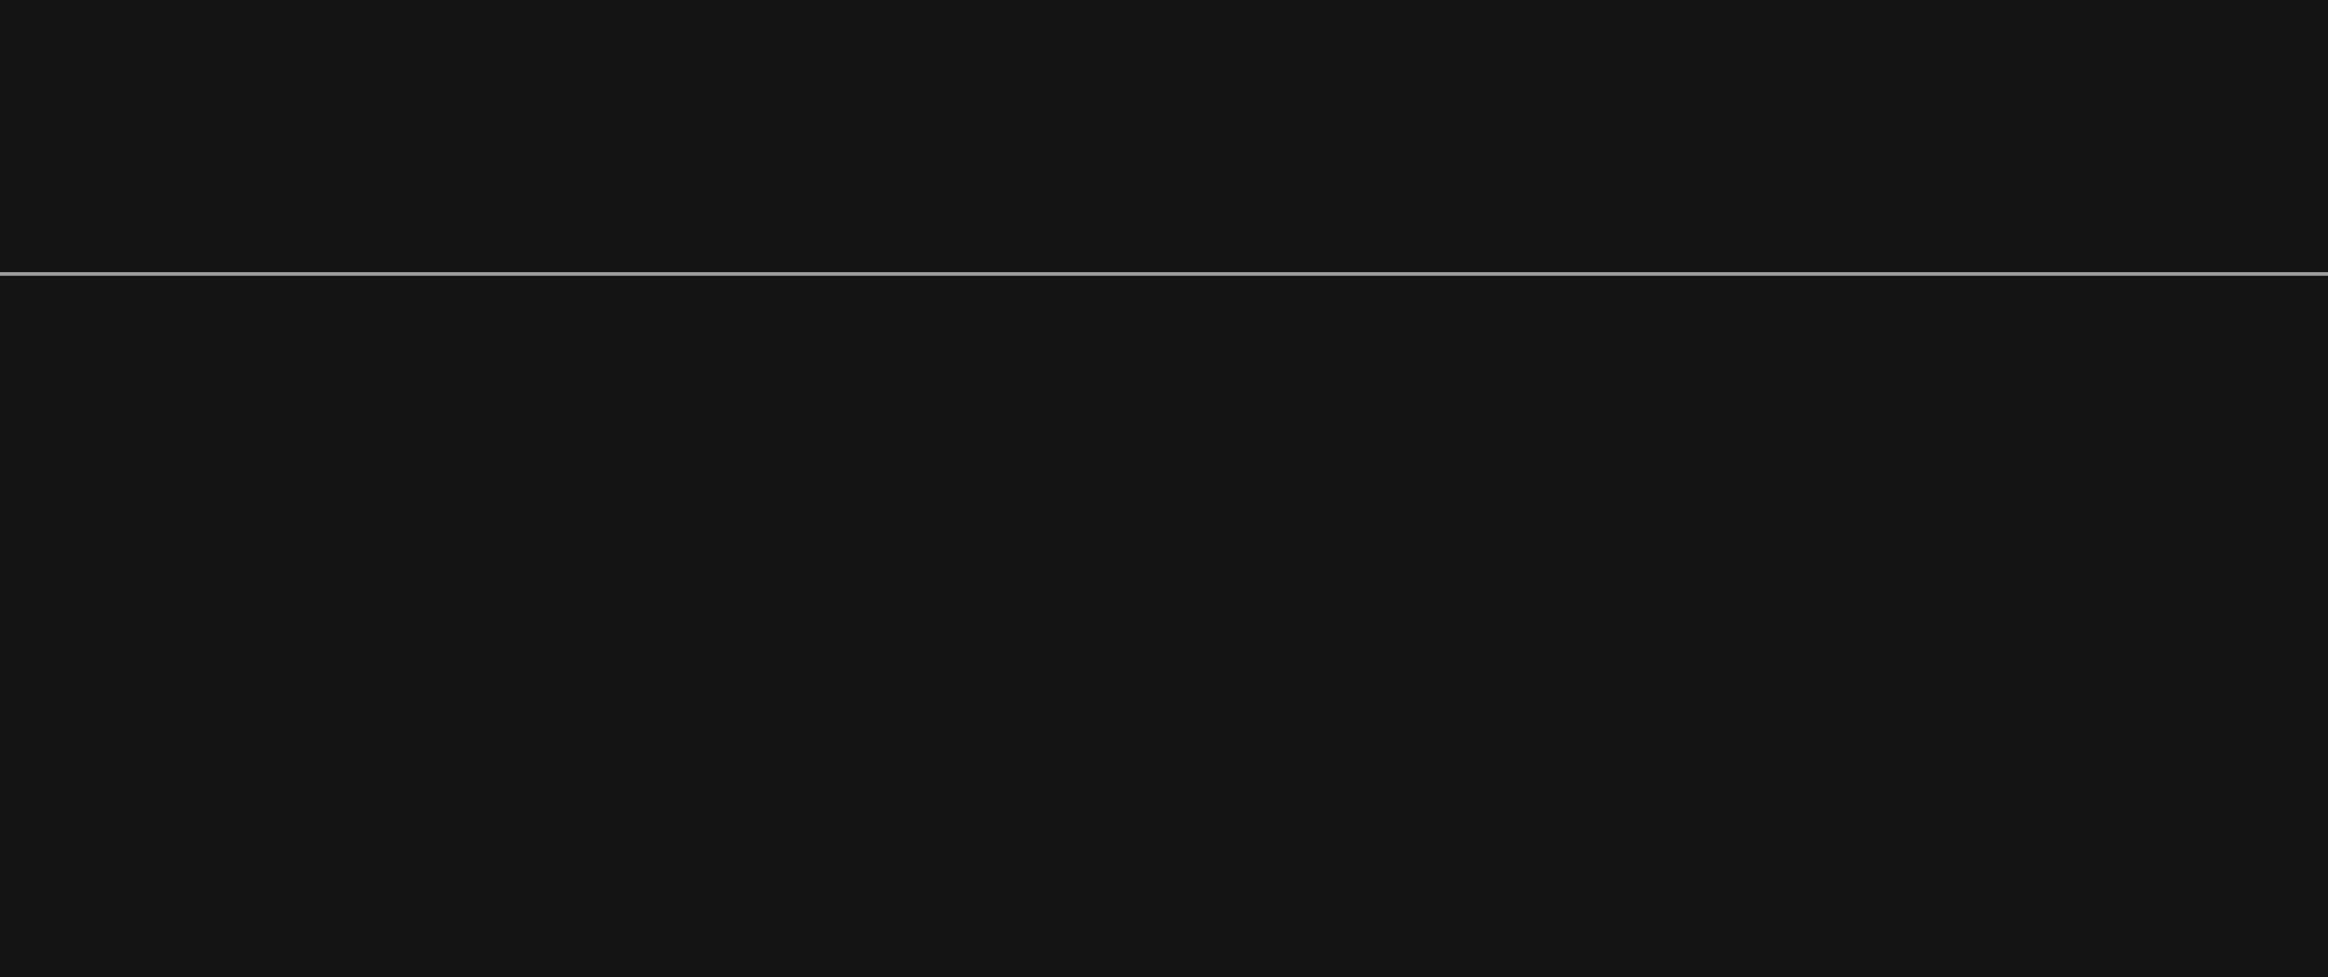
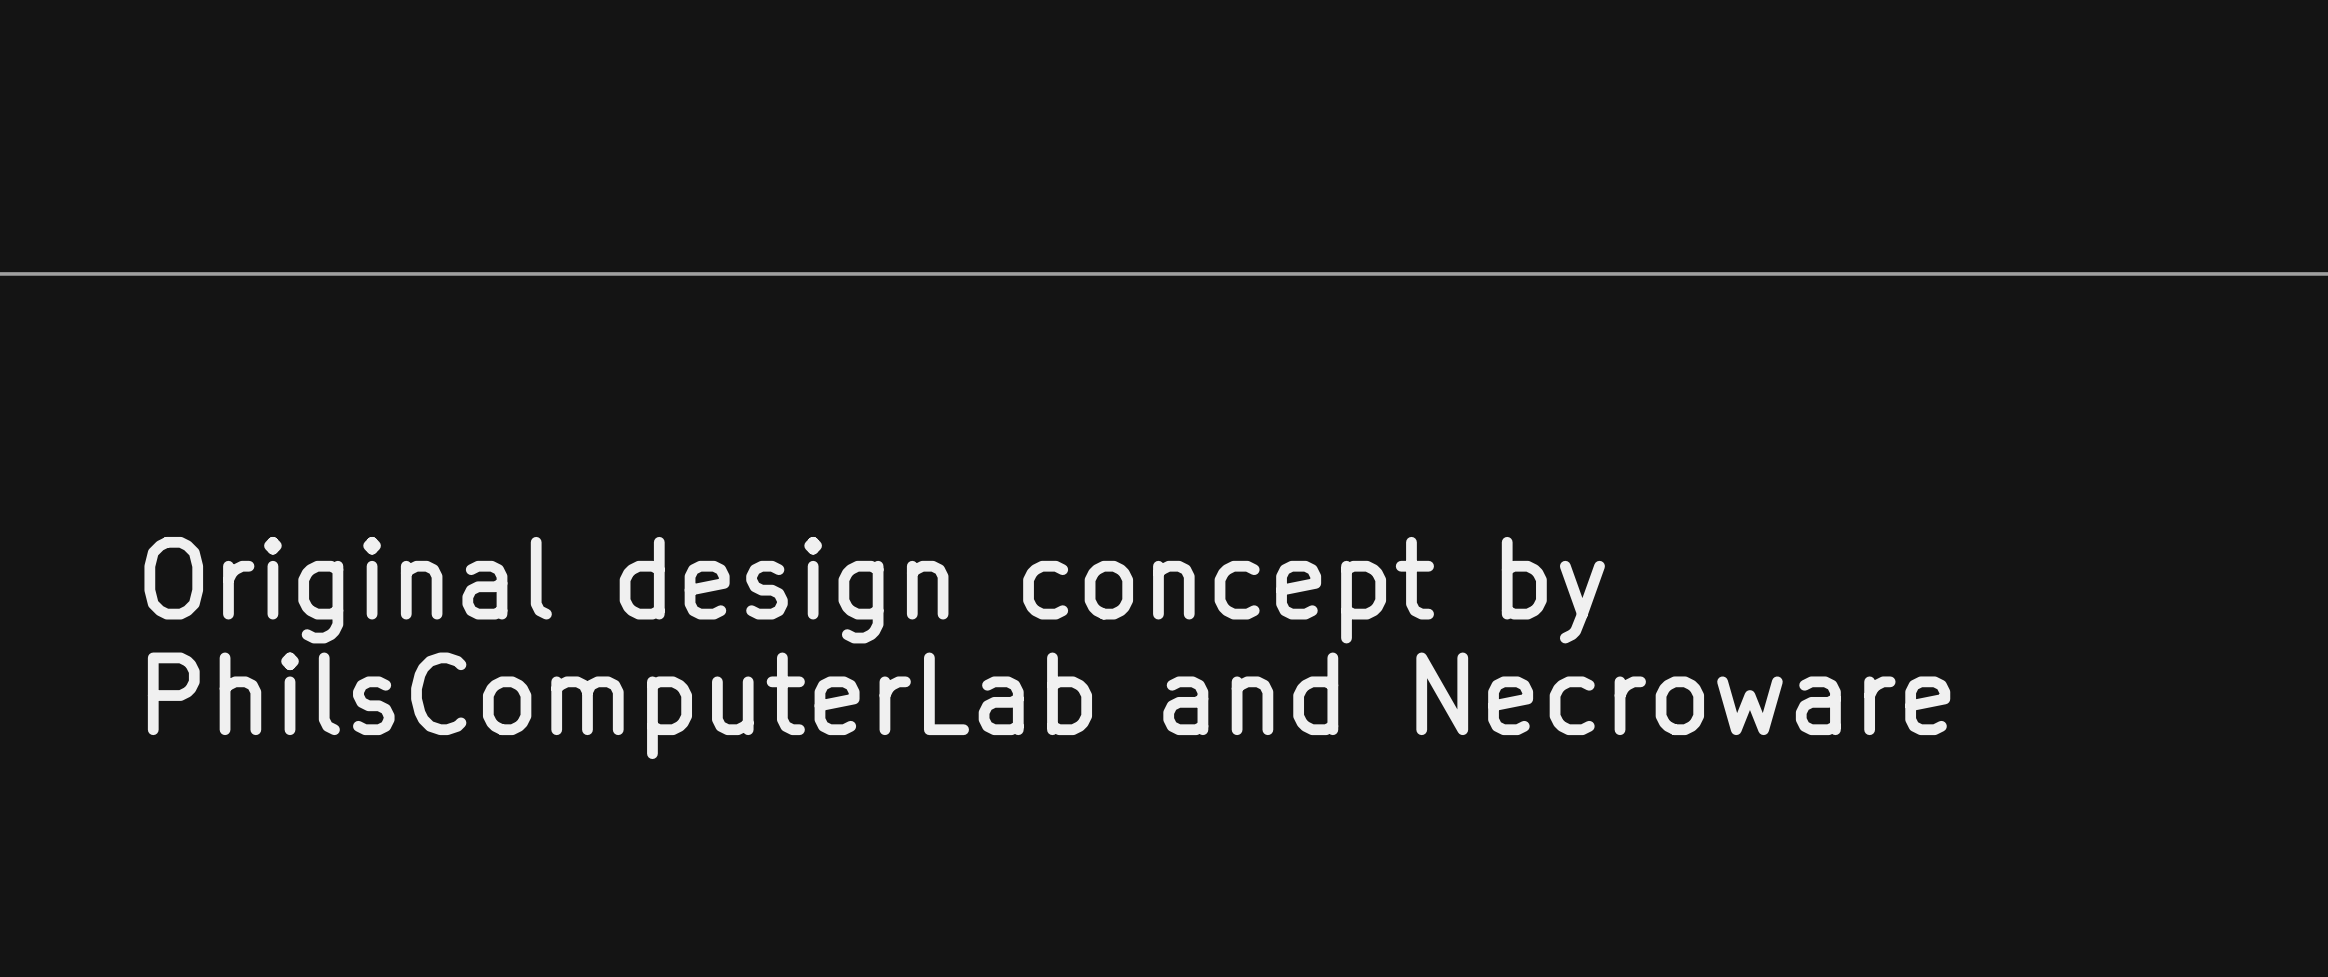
text: none -> Original design concept by (874, 590)
text: none -> PhilsComputerLab and Necroware (1049, 705)

